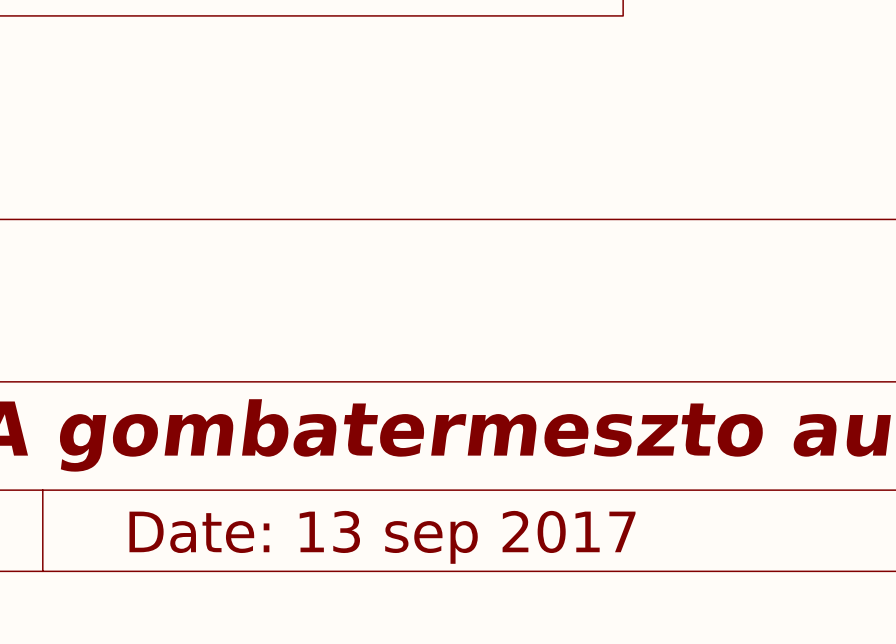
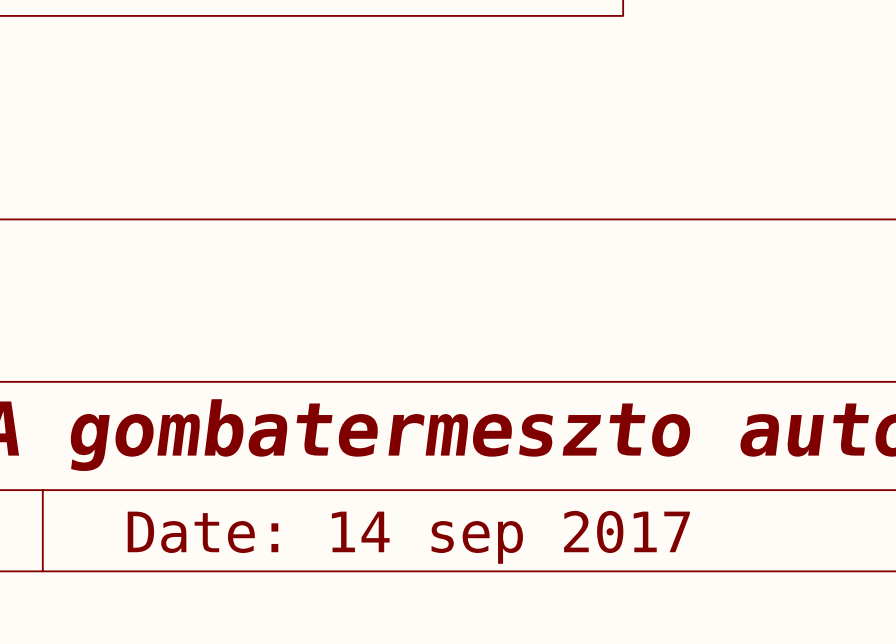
title block: Date: 13 sep 2017 (382, 537) -> Date: 14 sep 2017 (408, 537)

